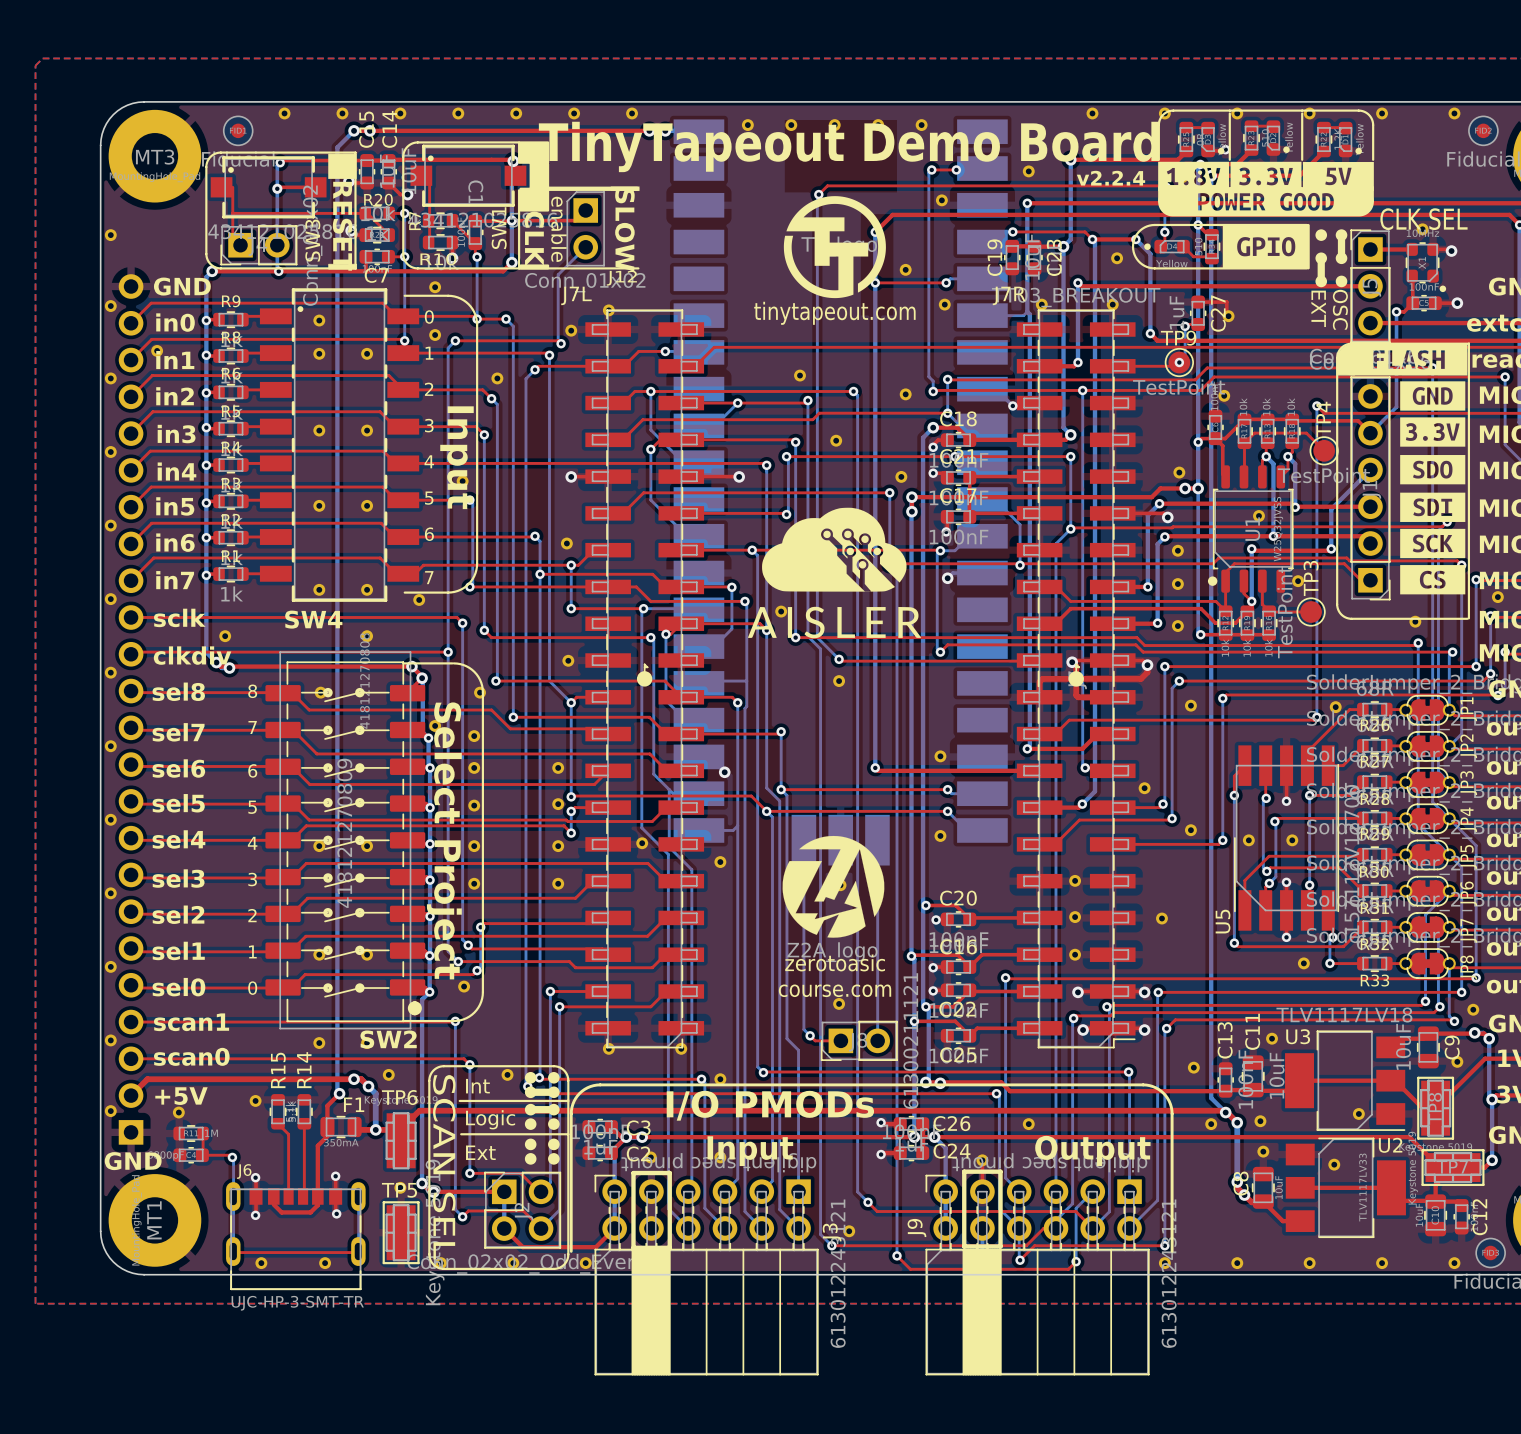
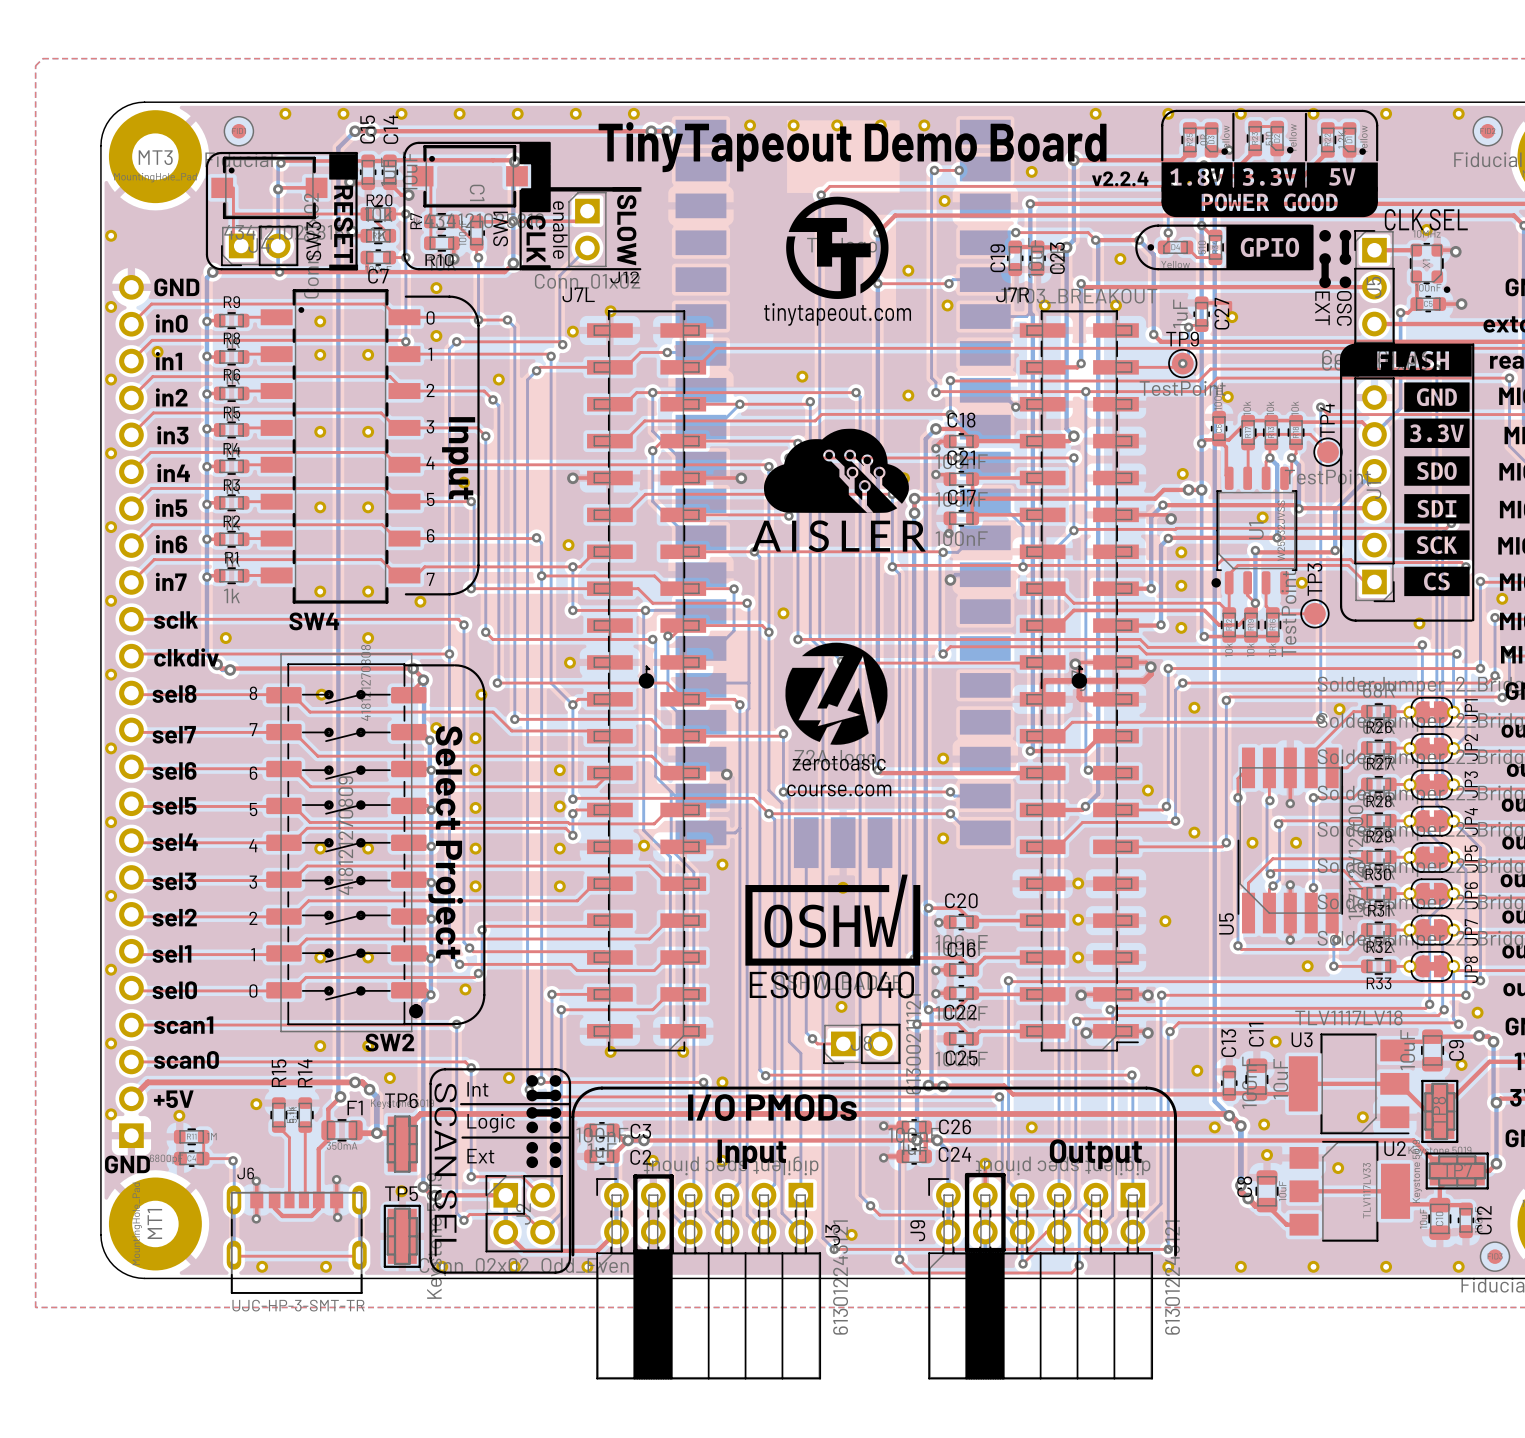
drawing position: (834, 549) -> (836, 470)
drawing position: (834, 622) -> (838, 536)
drawing: none -> [745, 874, 921, 966]
drawing position: (833, 886) -> (836, 693)
text position: zerotoasic (835, 962) -> zerotoasic (839, 762)
text position: course.com (835, 990) -> course.com (839, 790)

